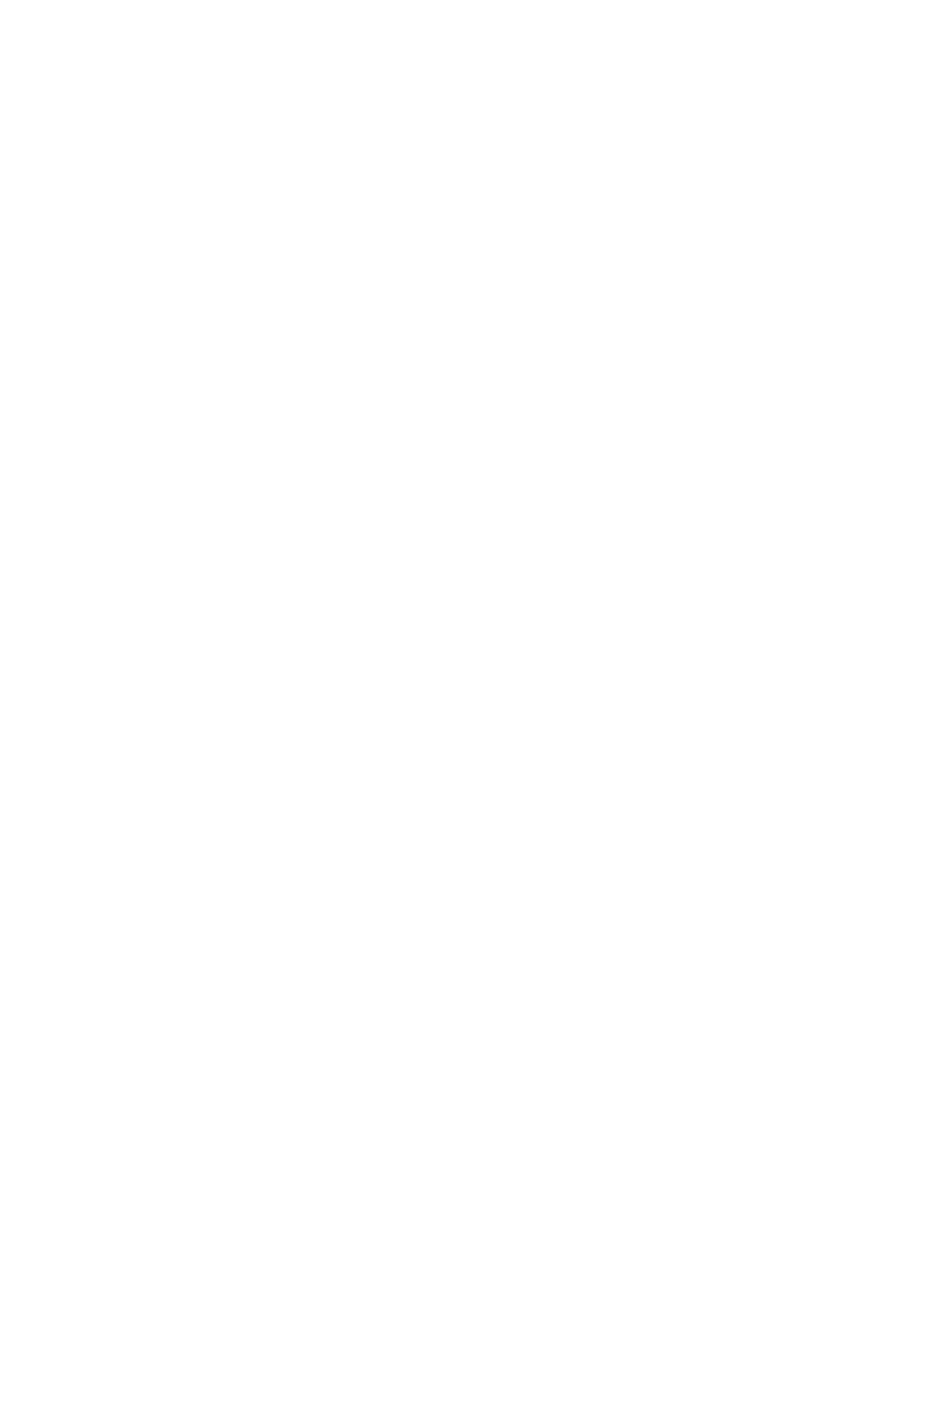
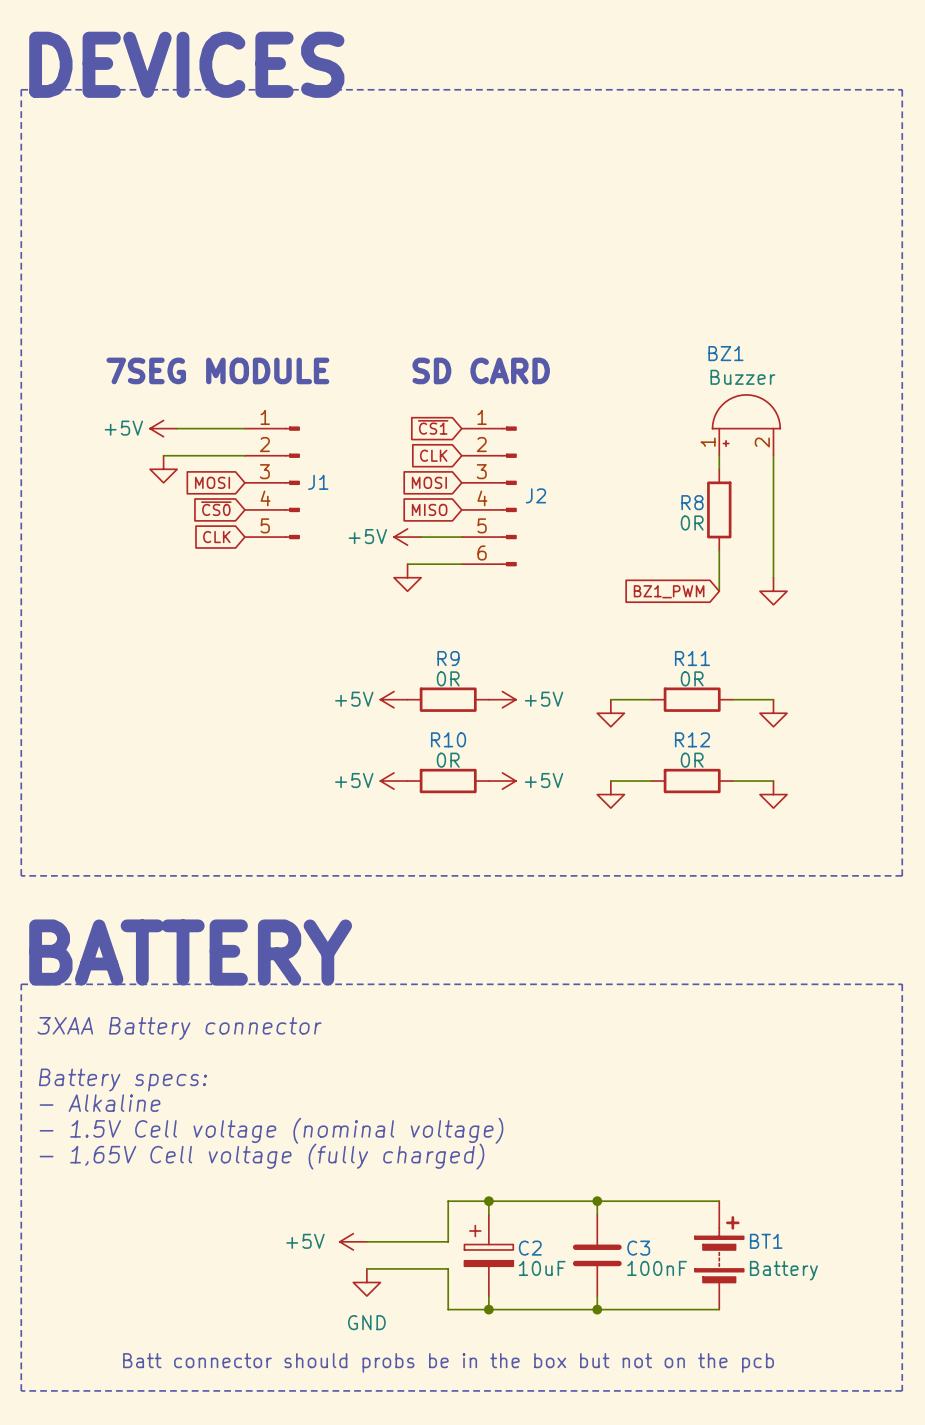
text: none -> DEVICES (186, 64)
line: none -> (21, 89) (21, 875) (902, 875) (902, 89) (21, 89)
text: none -> 7SEG MODULE (217, 370)
text: none -> SD CARD (481, 370)
BZ1: none -> Buzzer (746, 425)
global label: none -> ~{CS1} (433, 427)
power symbol: none -> +5V (163, 428)
wire: none -> (177, 428) (244, 428)
wire: none -> (163, 455) (244, 455)
global label: none -> CLK (433, 455)
wire: none -> (719, 455) (719, 469)
wire: none -> (773, 455) (773, 577)
power symbol: none -> (163, 469)
global label: none -> MOSI (212, 482)
J1: none -> (272, 482)
global label: none -> MOSI (429, 482)
J2: none -> (489, 496)
global label: none -> ~{CS0} (216, 508)
global label: none -> MISO (429, 509)
R8: none -> 0R (719, 509)
global label: none -> CLK (216, 537)
power symbol: none -> +5V (407, 537)
wire: none -> (421, 537) (461, 537)
wire: none -> (719, 550) (719, 591)
wire: none -> (407, 564) (461, 564)
power symbol: none -> (407, 577)
global label: none -> BZ1_PWM (669, 591)
power symbol: none -> (773, 591)
power symbol: none -> +5V (393, 699)
R9: none -> 0R (448, 699)
power symbol: none -> +5V (502, 699)
wire: none -> (610, 699) (651, 699)
R11: none -> 0R (692, 699)
wire: none -> (732, 699) (773, 699)
power symbol: none -> (610, 713)
power symbol: none -> (773, 713)
power symbol: none -> +5V (393, 781)
R10: none -> 0R (448, 781)
power symbol: none -> +5V (502, 781)
wire: none -> (610, 781) (651, 781)
R12: none -> 0R (692, 781)
wire: none -> (732, 781) (773, 781)
power symbol: none -> (610, 794)
power symbol: none -> (773, 794)
text: none -> BATTERY (190, 952)
line: none -> (21, 984) (902, 984) (902, 1390) (21, 1390) (21, 984)
text: none -> 3XAA Battery connector (179, 1028)
text: none -> Battery specs: (122, 1080)
text: none -> - Alkaline (100, 1103)
text: none -> - 1.5V Cell voltage (nominal voltage) (271, 1130)
text: none -> - 1,65V Cell voltage (fully charged) (262, 1156)
wire: none -> (488, 1201) (488, 1214)
junction: none -> (488, 1201)
wire: none -> (597, 1201) (597, 1214)
junction: none -> (597, 1201)
wire: none -> (719, 1201) (448, 1201) (448, 1241) (366, 1241)
power symbol: none -> +5V (353, 1241)
C2: none -> 10uF (488, 1255)
C3: none -> 100nF (597, 1255)
BT1: none -> Battery (719, 1255)
wire: none -> (366, 1268) (448, 1268) (448, 1309) (719, 1309)
power symbol: none -> GND (366, 1282)
wire: none -> (488, 1296) (488, 1309)
wire: none -> (597, 1296) (597, 1309)
junction: none -> (488, 1309)
junction: none -> (597, 1309)
text: none -> Batt connector should probs be in the box but not on the pcb (448, 1362)

